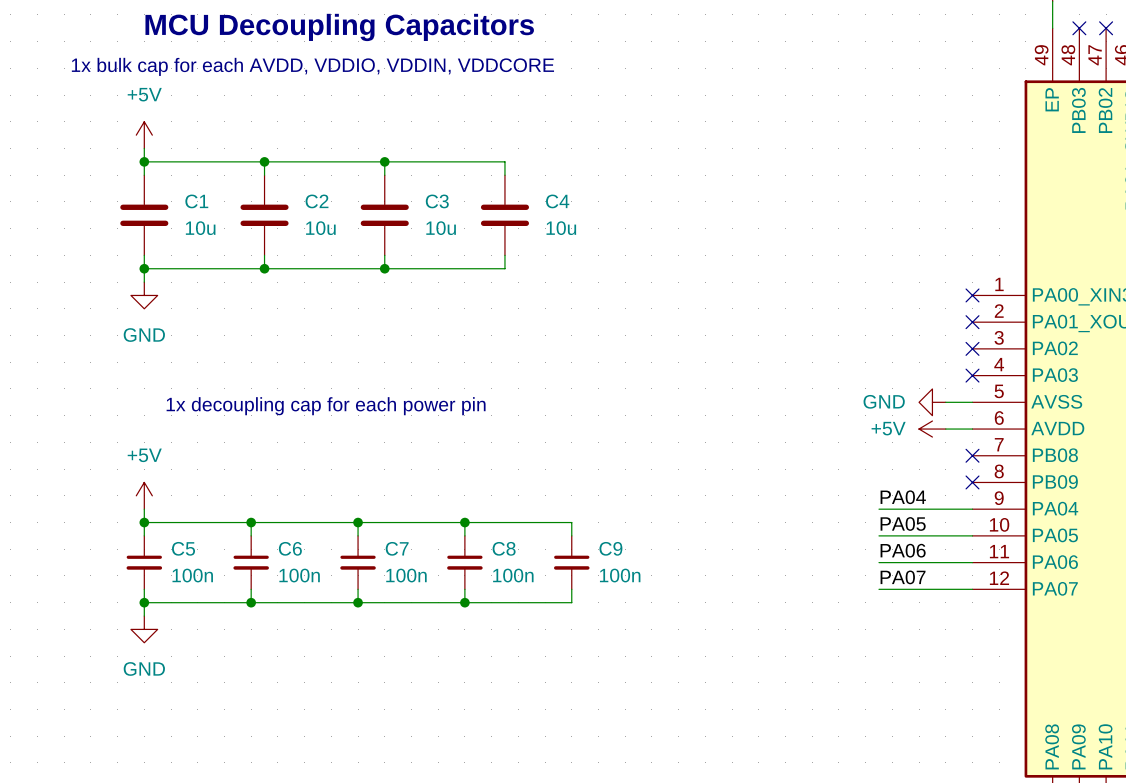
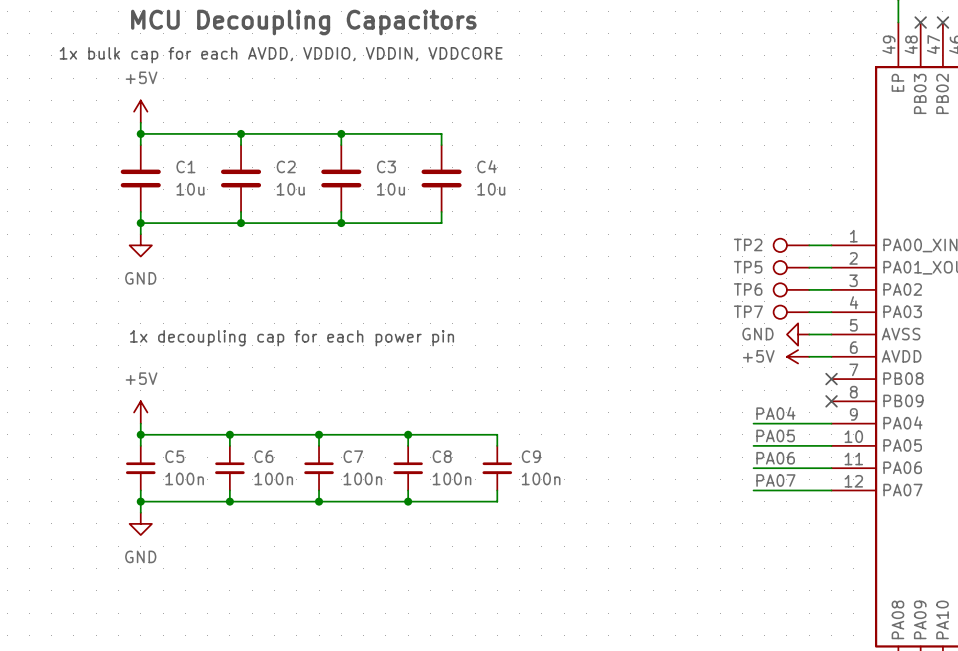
TP2: none -> (791, 245)
wire: none -> (809, 245) (831, 245)
no-connect mark: (972, 295) -> none
TP5: none -> (791, 267)
wire: none -> (809, 267) (831, 267)
no-connect mark: (972, 322) -> none
TP6: none -> (791, 289)
wire: none -> (809, 289) (831, 289)
no-connect mark: (972, 348) -> none
TP7: none -> (791, 312)
wire: none -> (809, 312) (831, 312)
no-connect mark: (972, 375) -> none

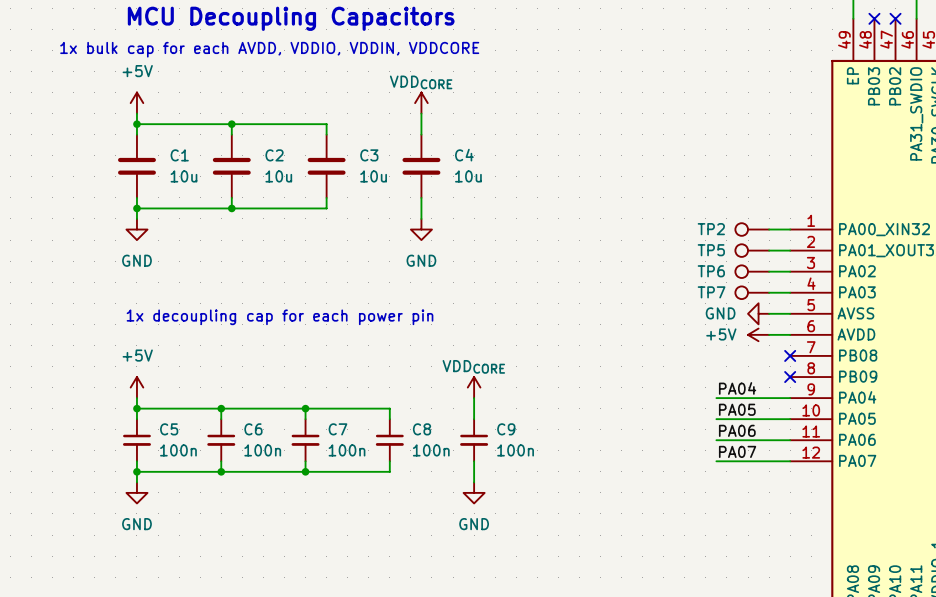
power symbol: none -> VDDCORE (421, 103)
wire: (341, 133) (441, 133) -> (421, 113) (421, 124)
junction: (341, 133) -> none
wire: (341, 223) (441, 223) -> (421, 218) (421, 208)
junction: (341, 223) -> none
power symbol: none -> GND (421, 229)
power symbol: none -> VDDCORE (474, 387)
wire: (408, 434) (497, 434) -> (474, 398) (474, 408)
junction: (408, 434) -> none
wire: (408, 501) (497, 501) -> (474, 482) (474, 471)
junction: (408, 501) -> none
power symbol: none -> GND (474, 492)

